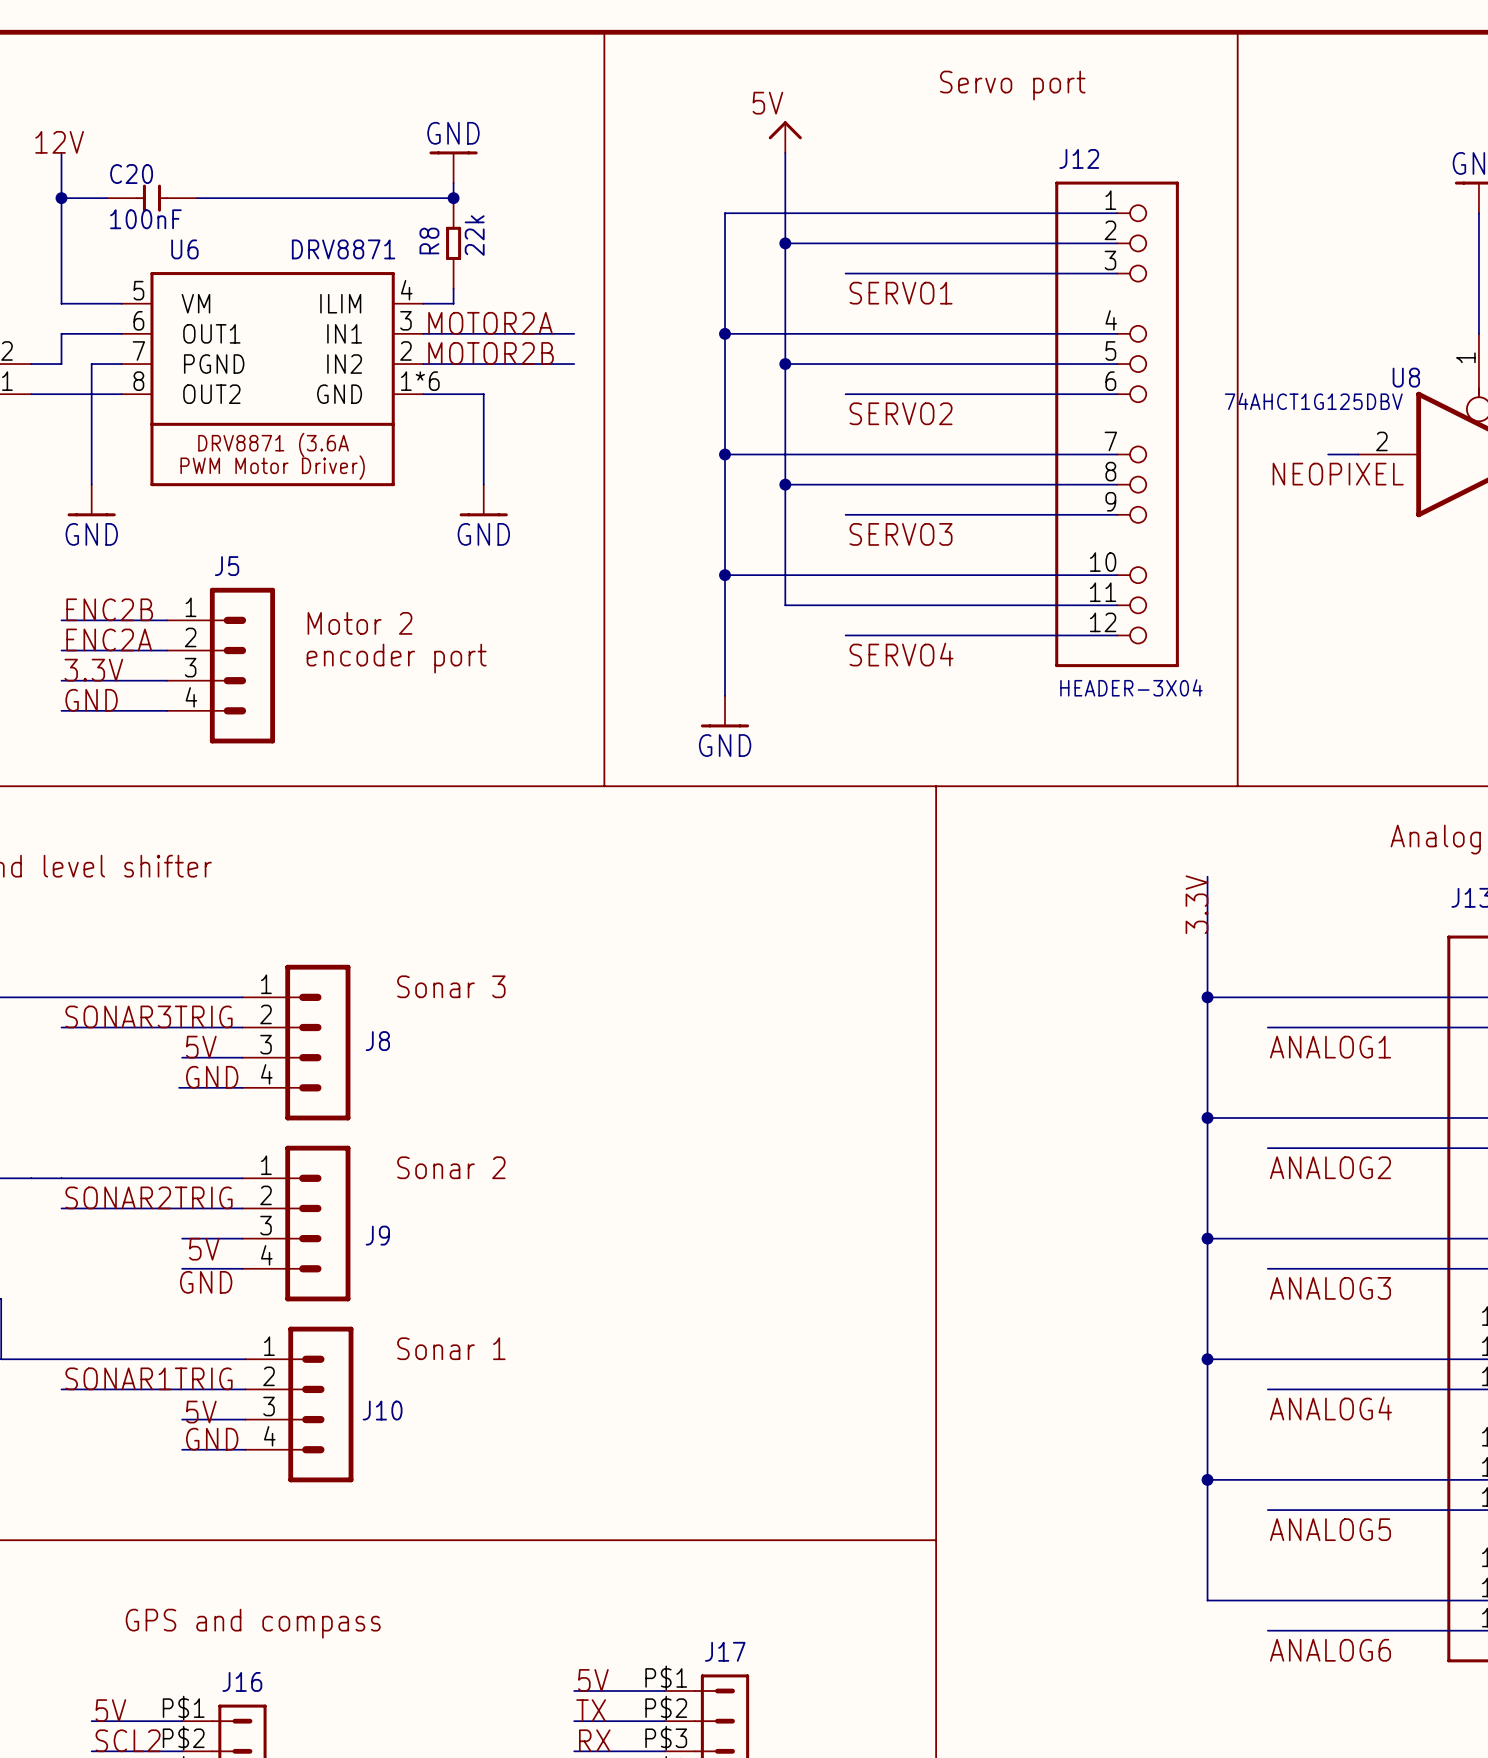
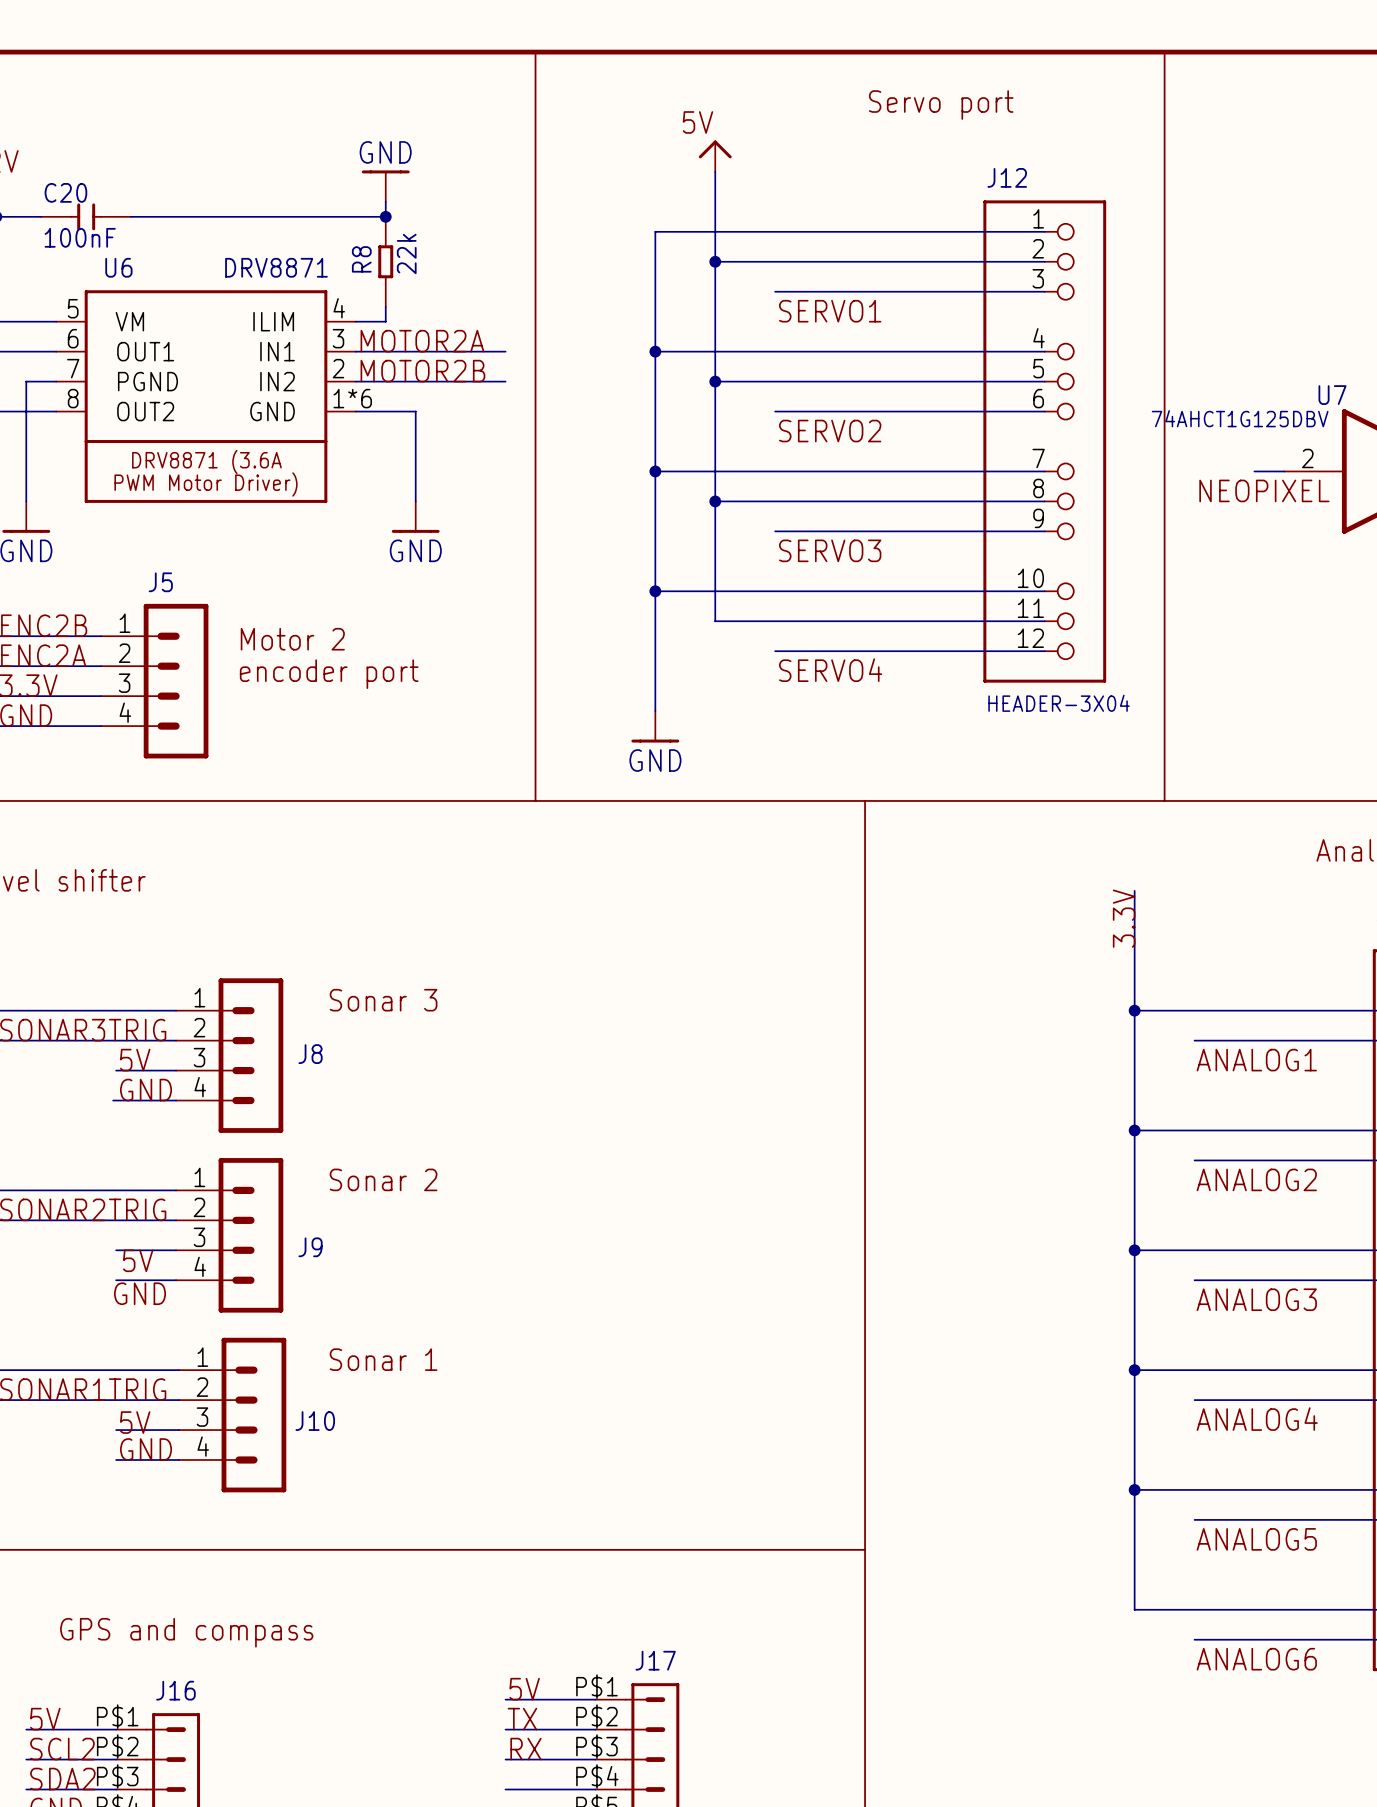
U8 name: U8 (1406, 377) -> U7 (1332, 395)

